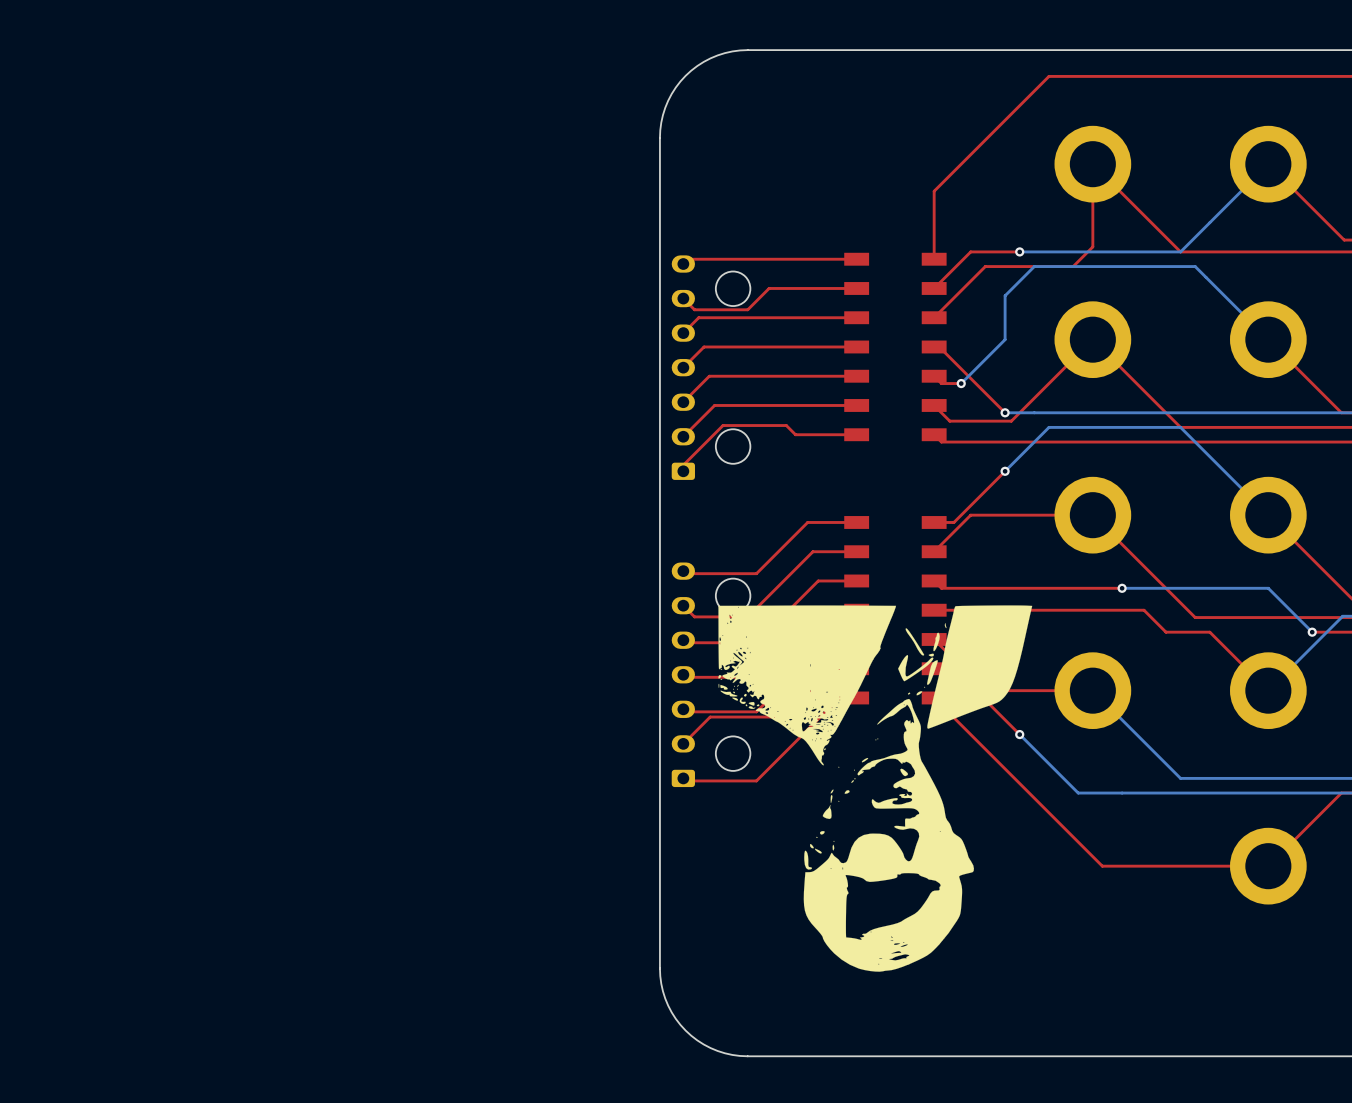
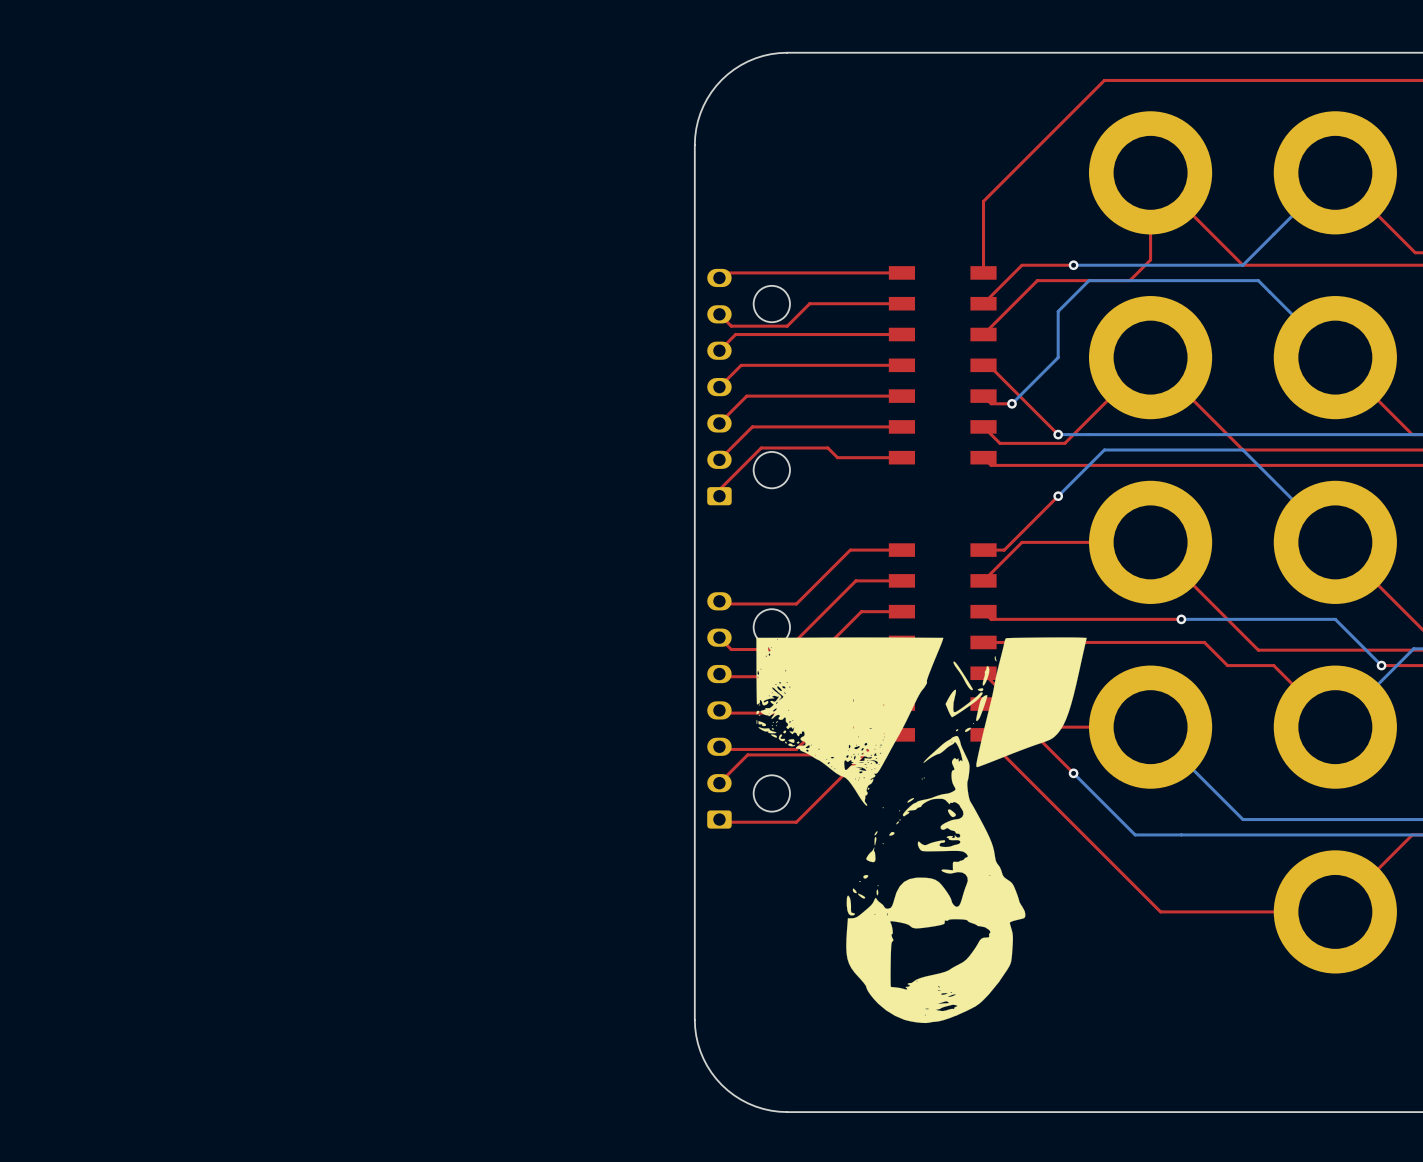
part footprint: [1054, 125, 1132, 203] -> [1088, 111, 1213, 235]
part footprint: [1230, 125, 1307, 203] -> [1273, 111, 1397, 235]
part footprint: [1054, 301, 1132, 379] -> [1088, 296, 1213, 420]
part footprint: [1230, 301, 1307, 379] -> [1273, 296, 1397, 420]
part footprint: [1054, 476, 1132, 554] -> [1088, 480, 1213, 604]
part footprint: [1230, 476, 1307, 554] -> [1273, 480, 1397, 604]
part footprint: [1054, 652, 1132, 730] -> [1088, 665, 1213, 789]
part footprint: [1230, 652, 1307, 730] -> [1273, 665, 1397, 789]
part footprint: [1230, 827, 1307, 905] -> [1273, 850, 1397, 974]

